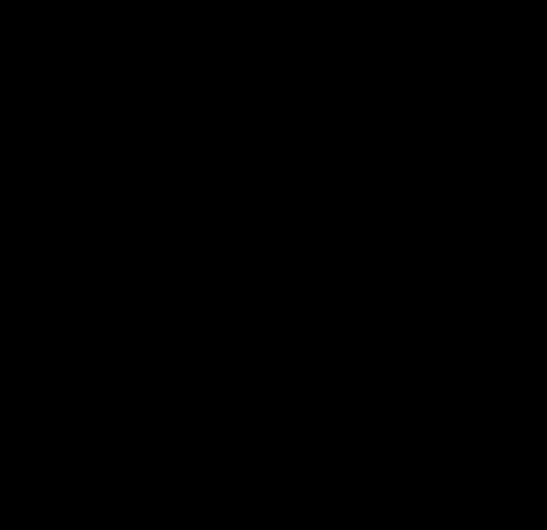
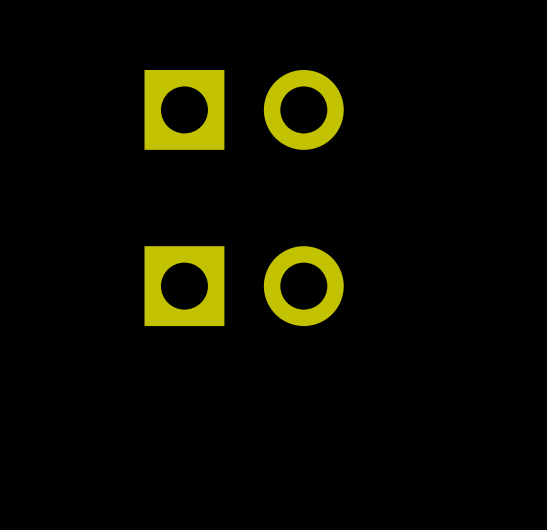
part: none -> (244, 109)
part: none -> (244, 286)

